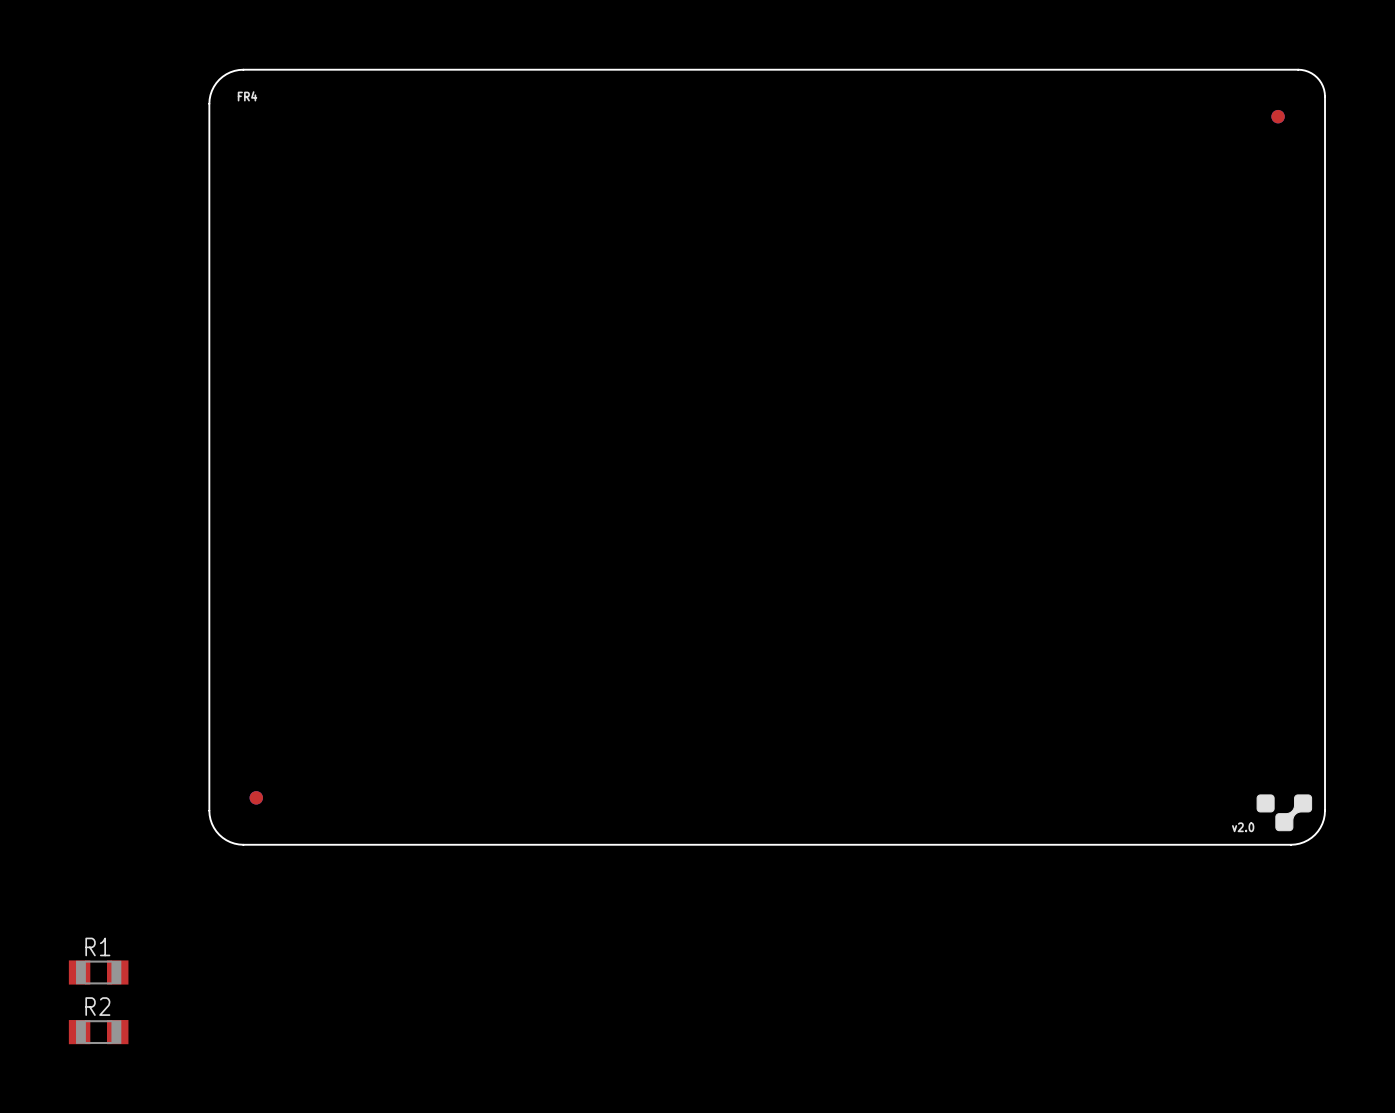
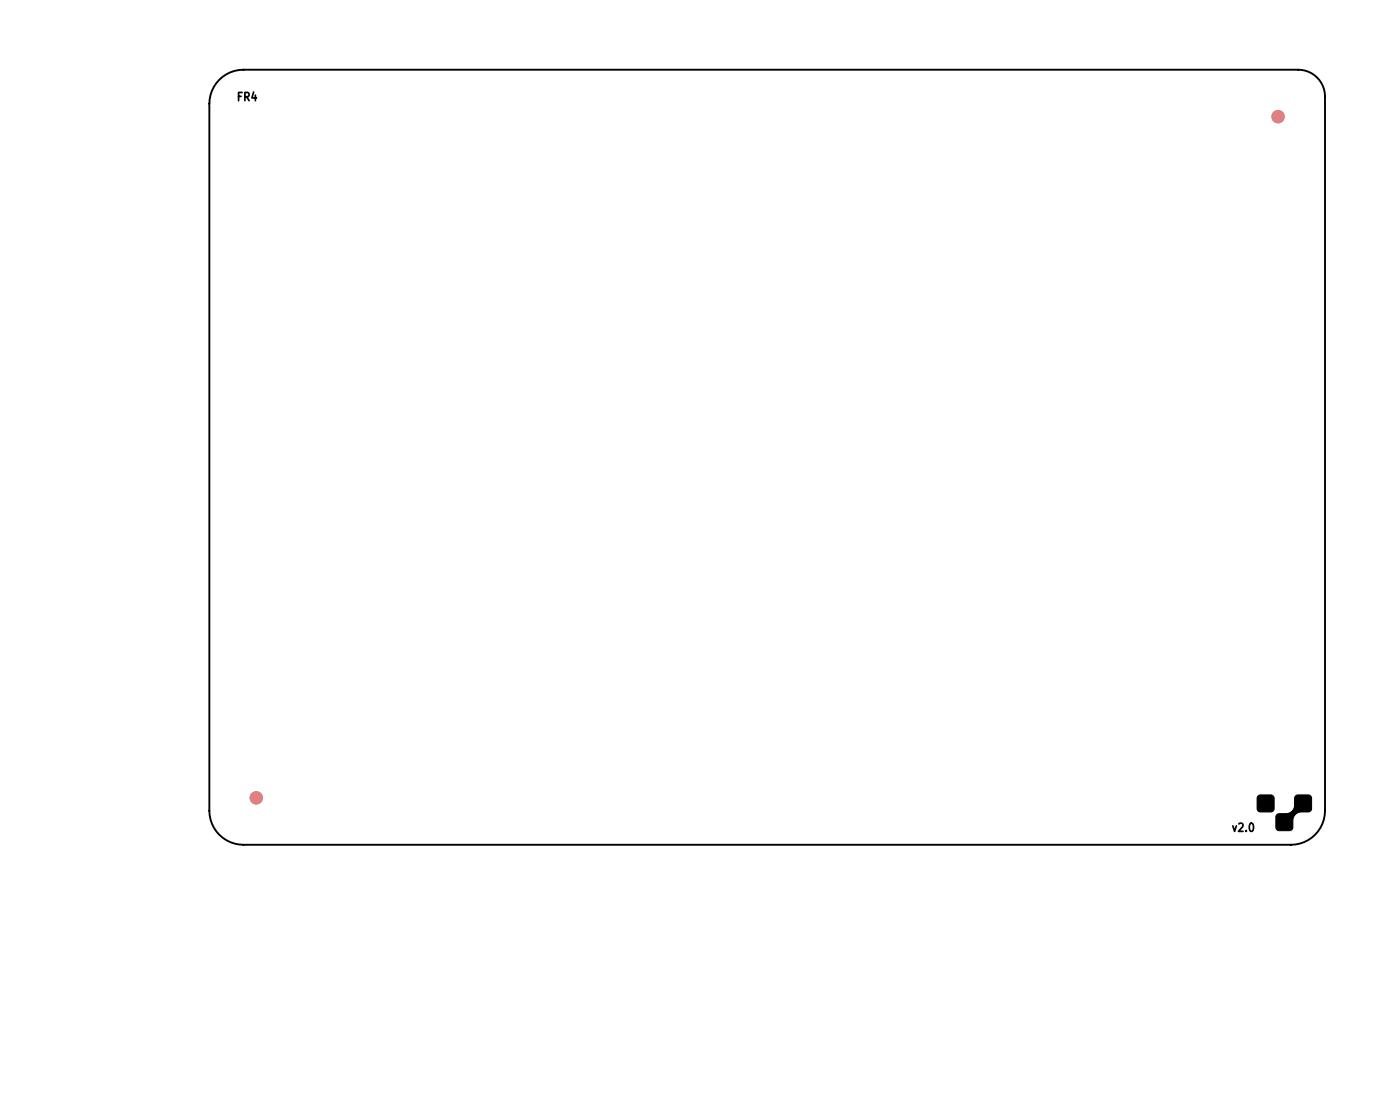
R1: (98, 972) -> none
R2: (98, 1032) -> none

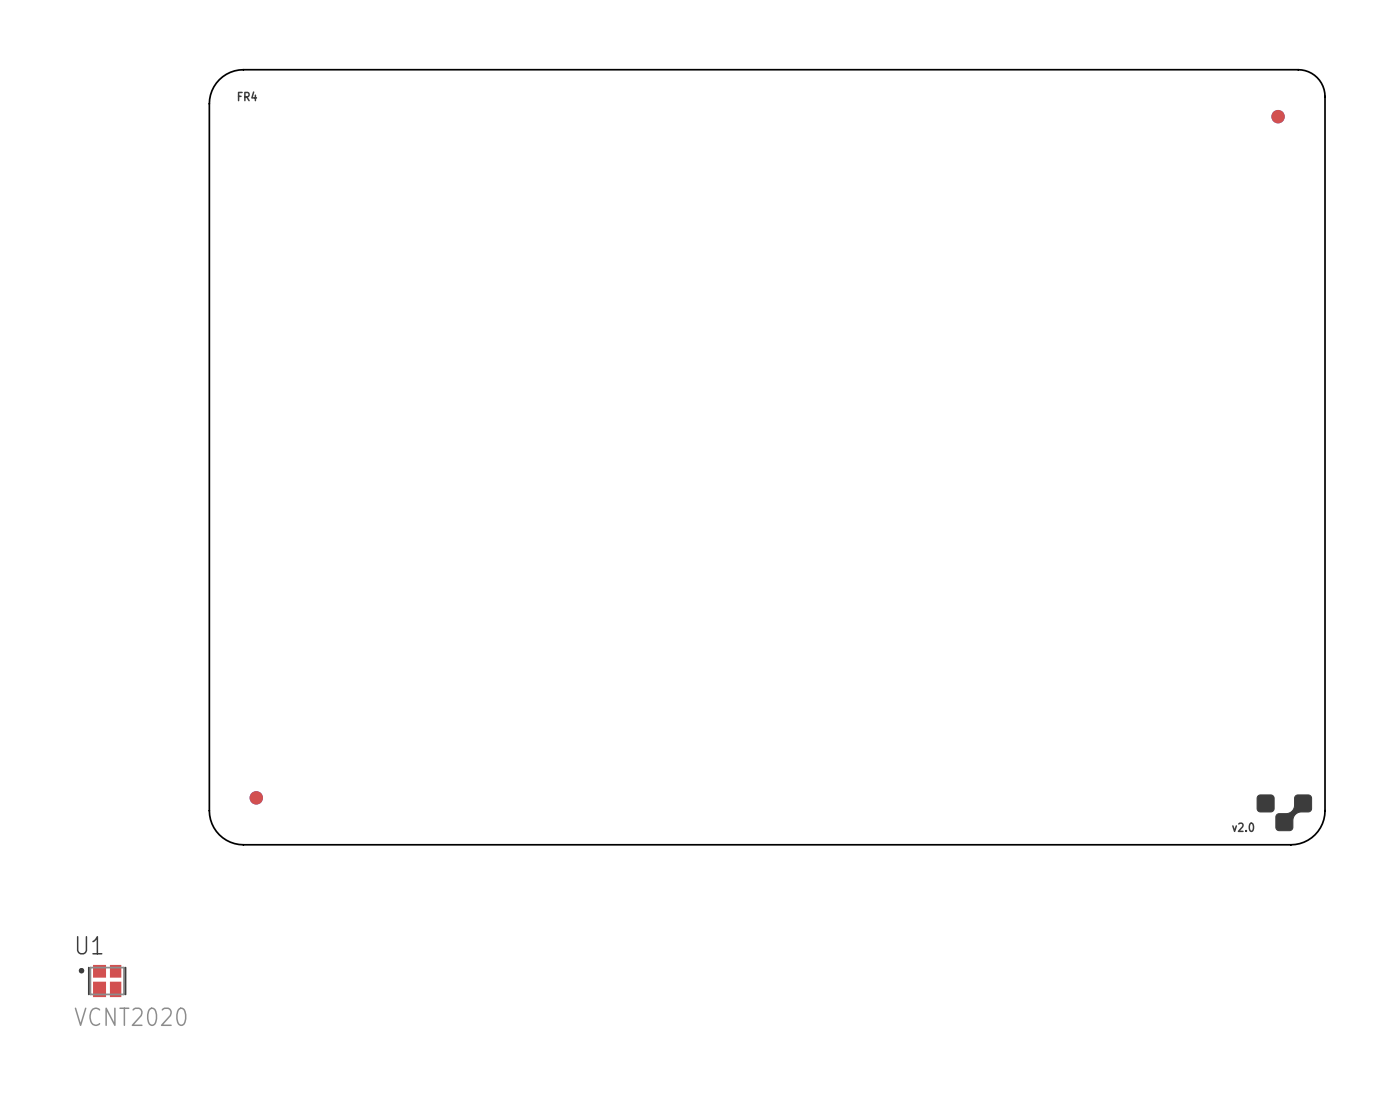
U1: none -> VCNT2020 (102, 981)

